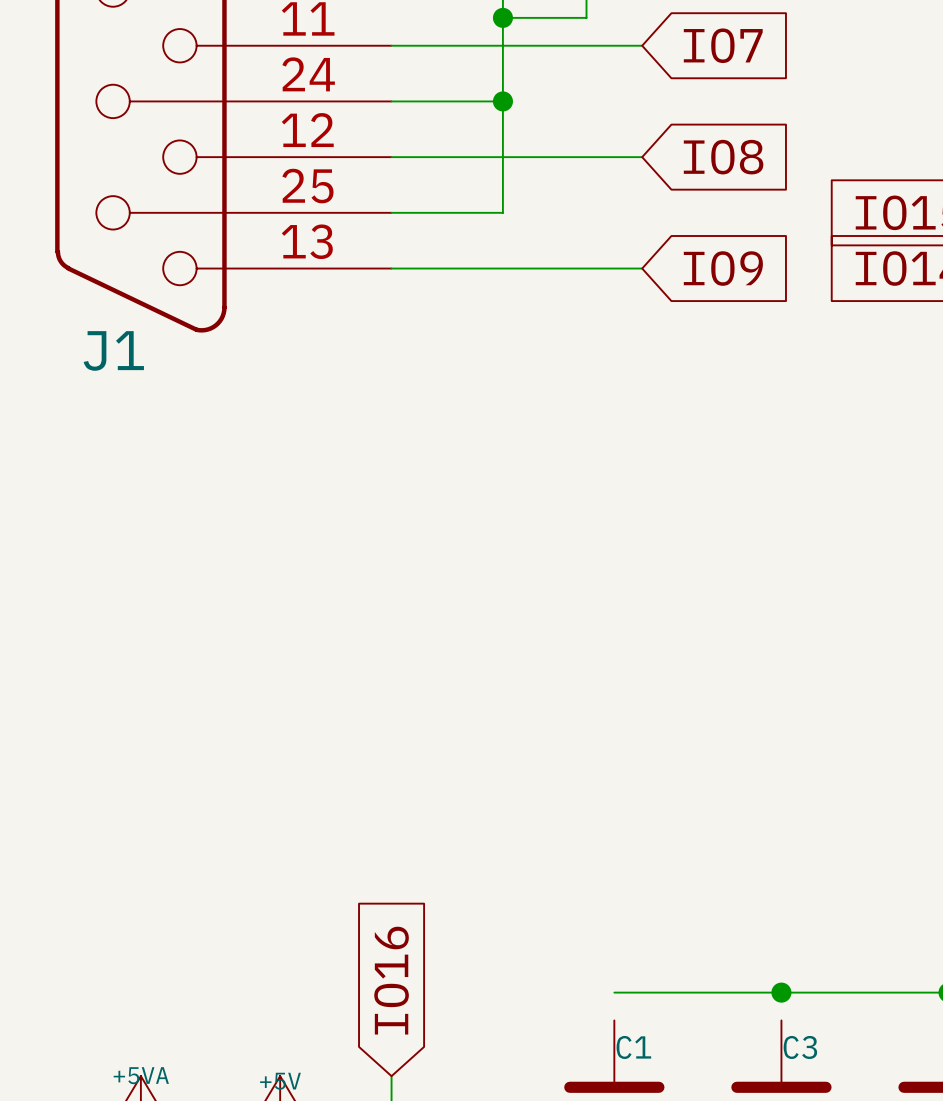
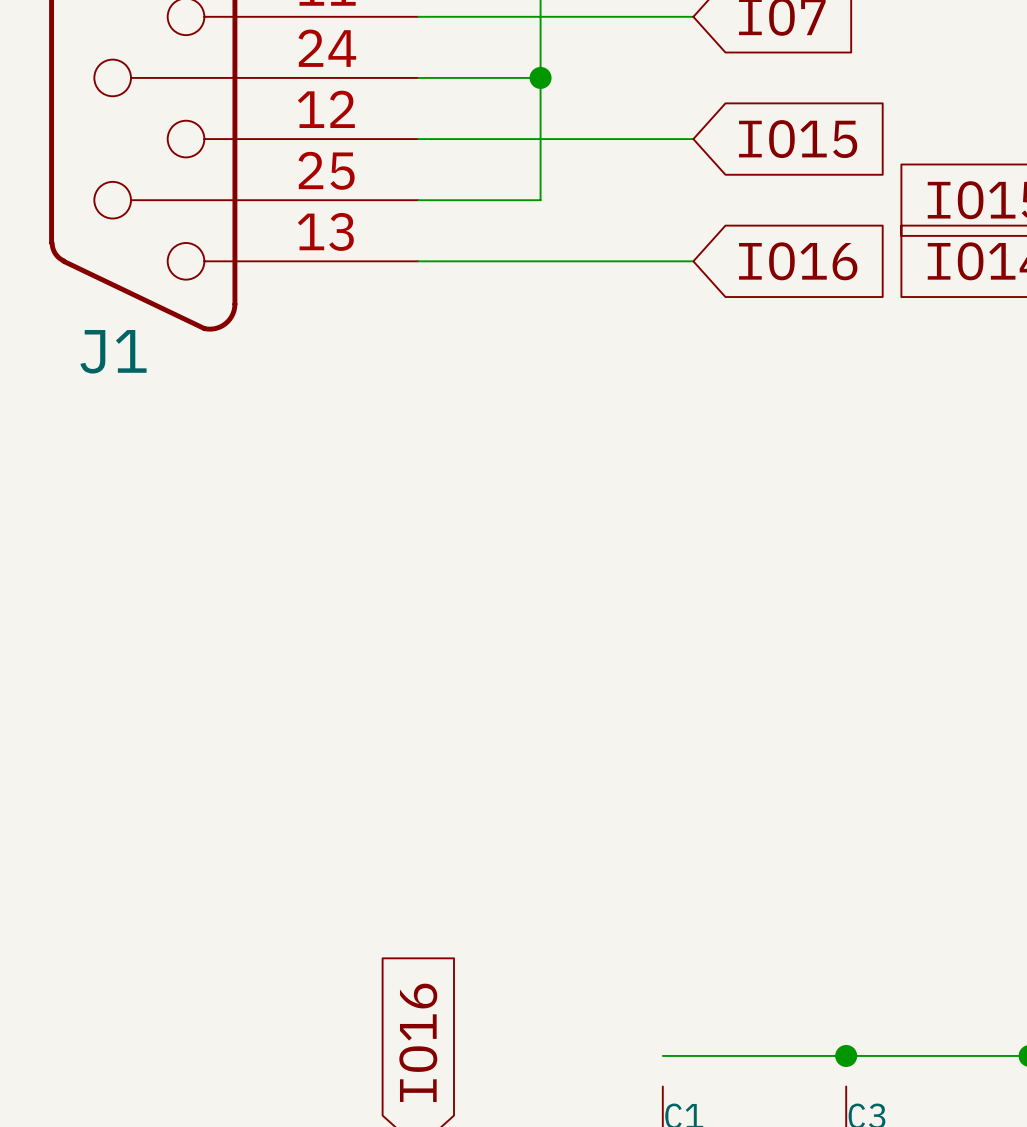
global label: IO8 (723, 157) -> IO15 (798, 139)
global label: IO9 (723, 268) -> IO16 (798, 261)

